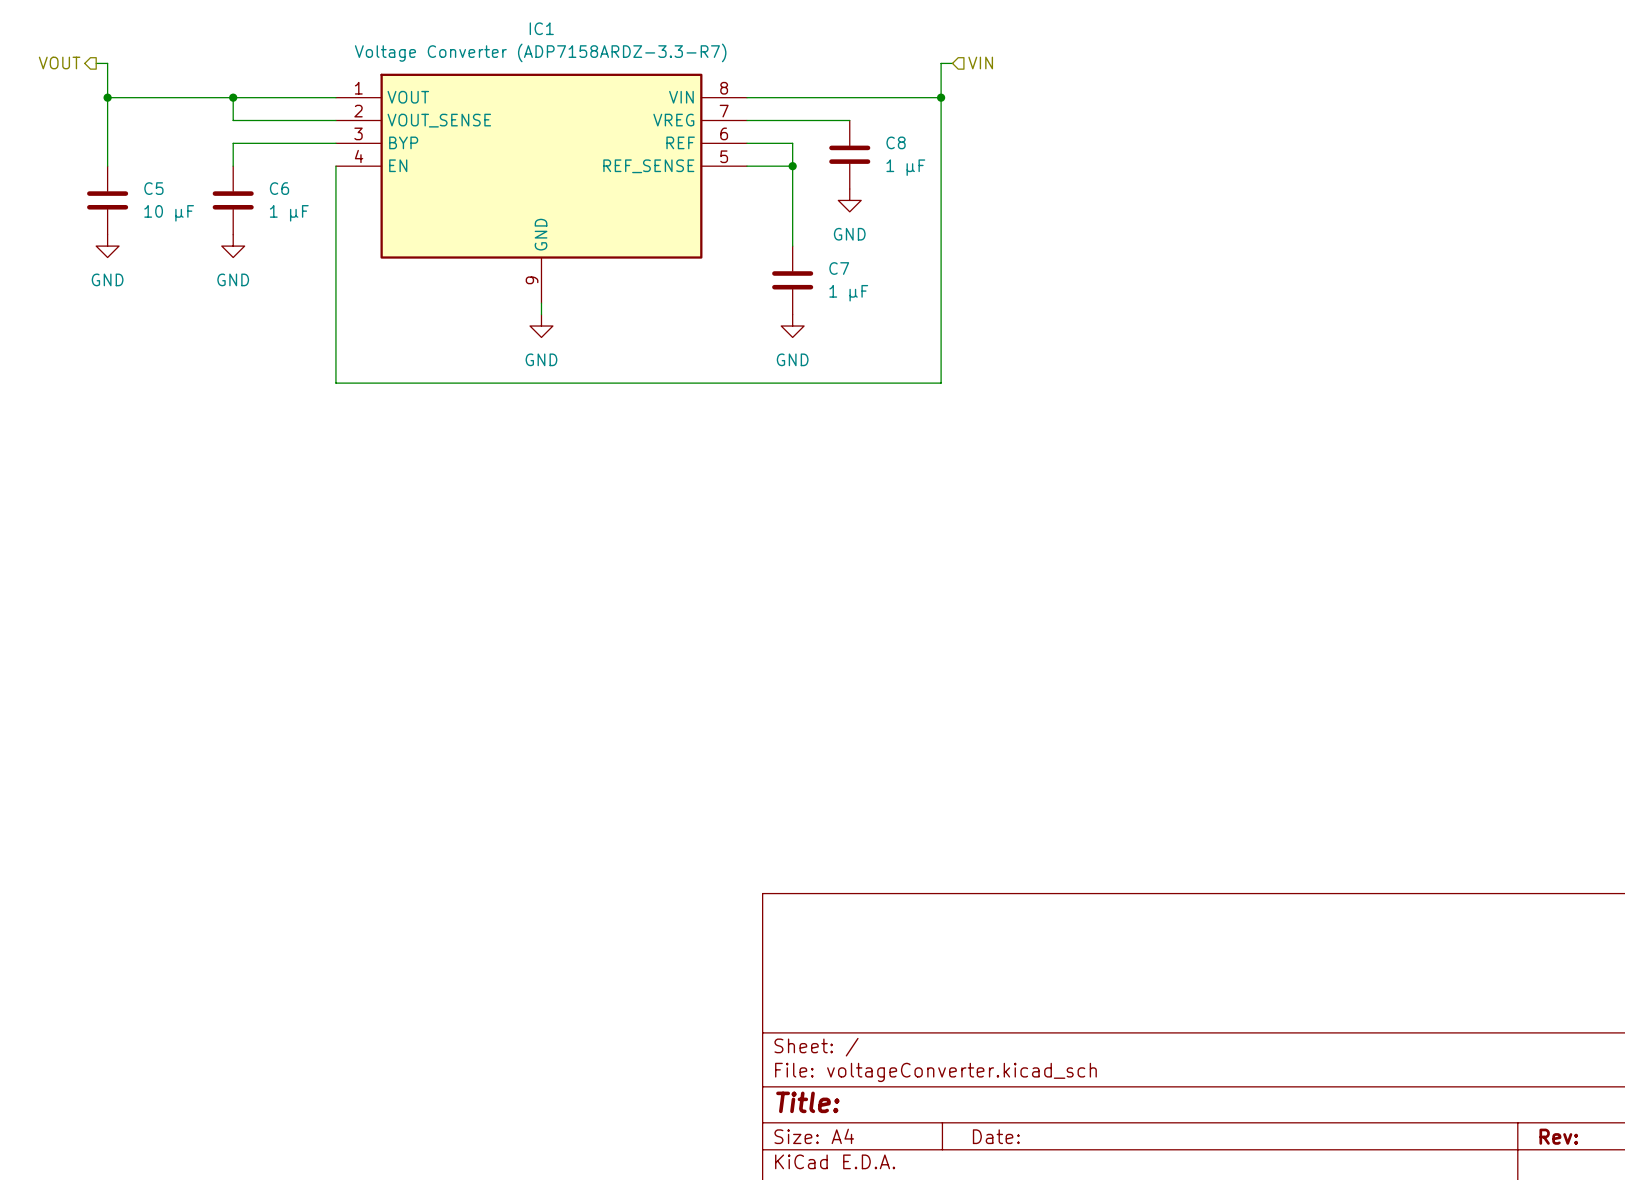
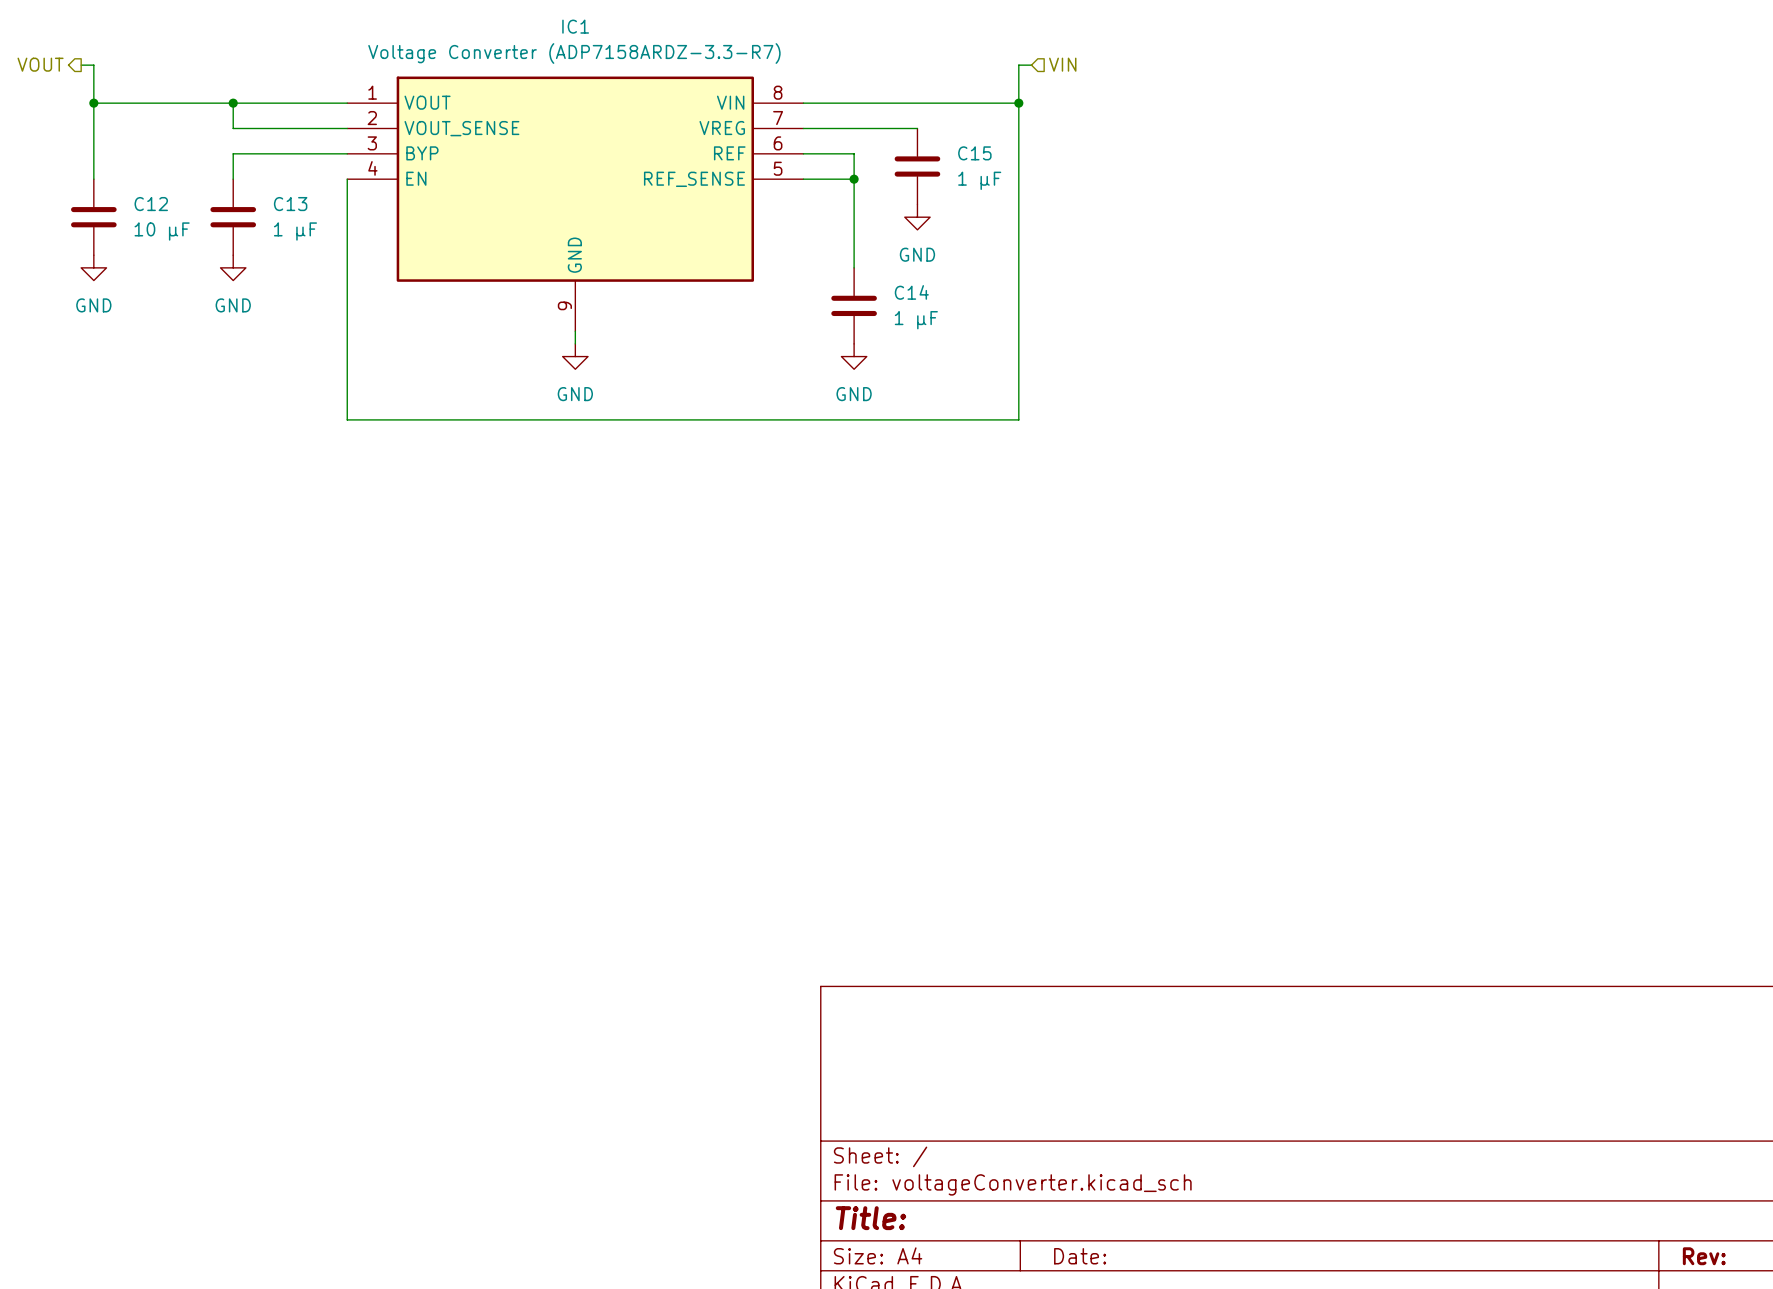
C8 name: C8 (896, 142) -> C15 (974, 153)
C5 name: C5 (153, 188) -> C12 (151, 204)
C6 name: C6 (279, 188) -> C13 (290, 204)
C7 name: C7 (839, 268) -> C14 (911, 292)

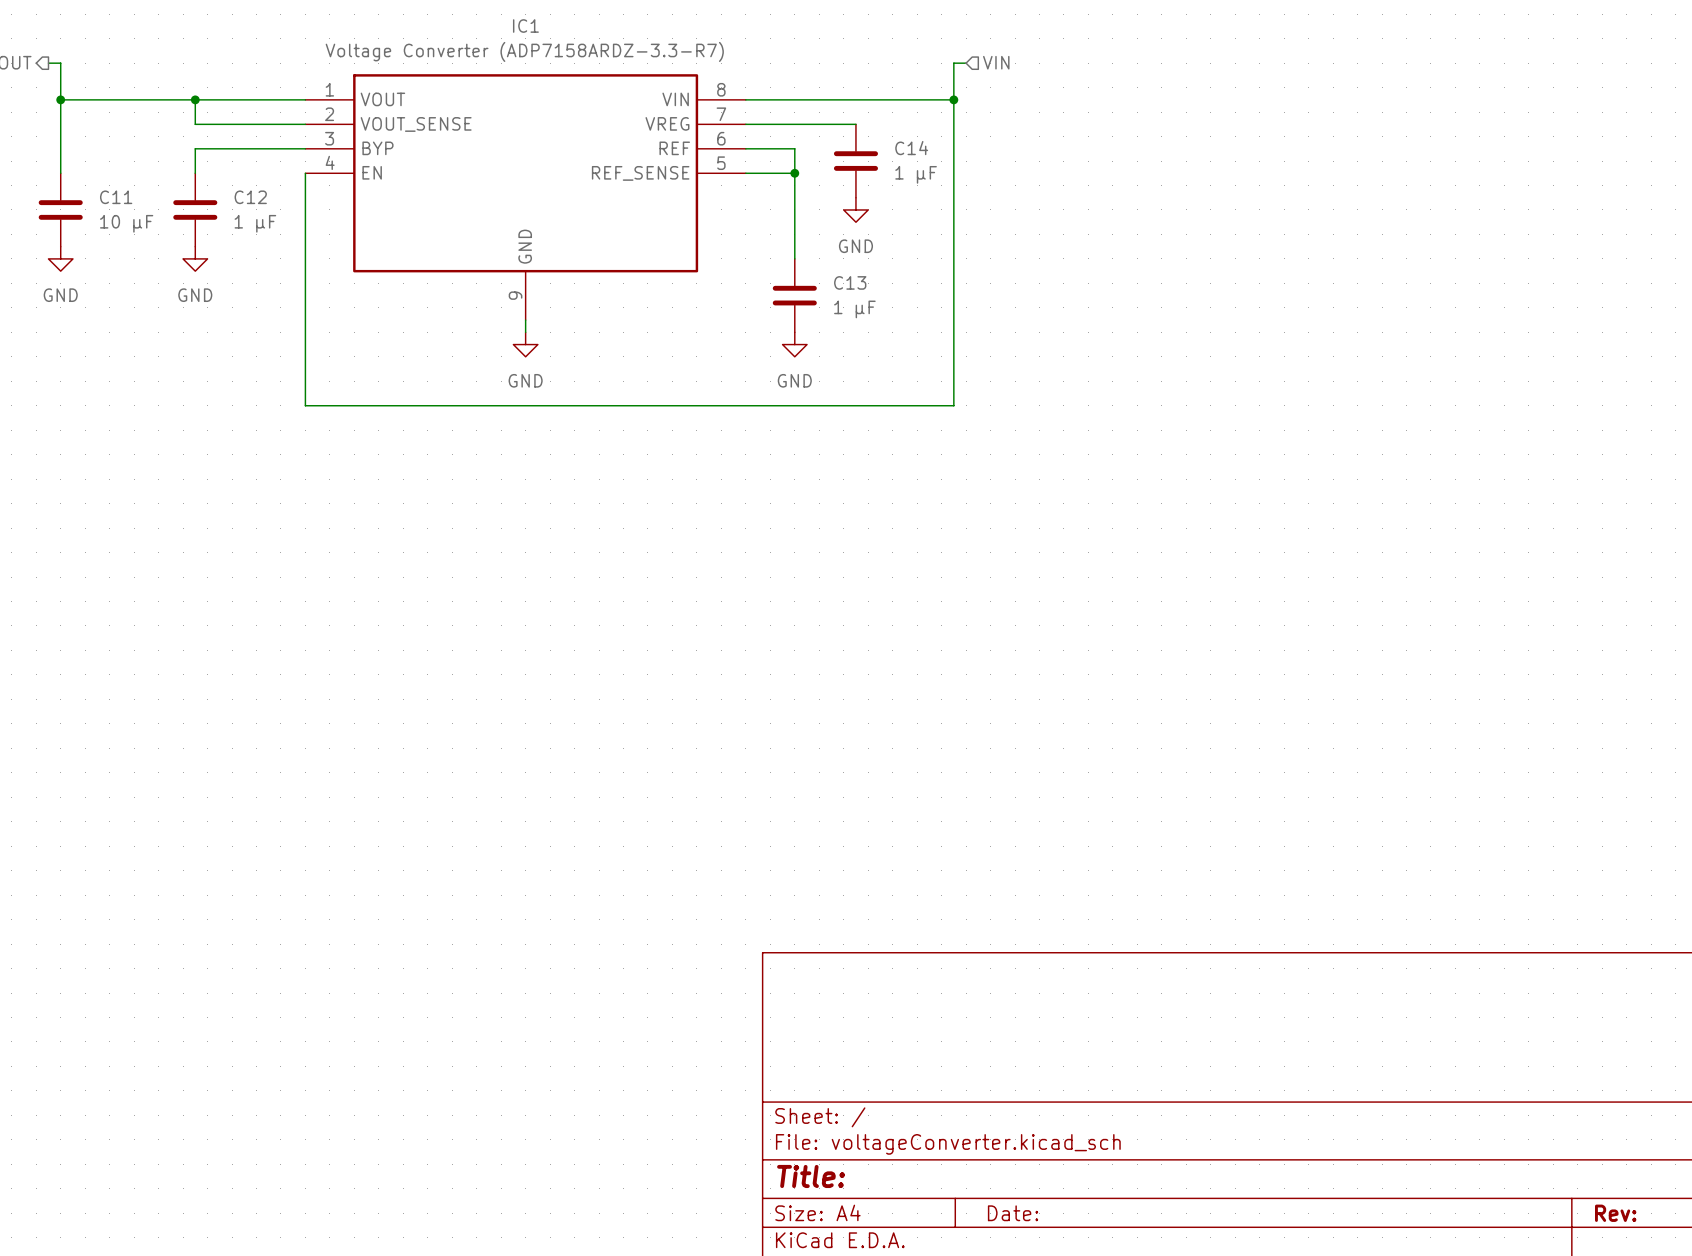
C15 name: C15 (974, 153) -> C14 (911, 148)
C12 name: C12 (151, 204) -> C11 (116, 197)
C13 name: C13 (290, 204) -> C12 (250, 197)
C14 name: C14 (911, 292) -> C13 (850, 282)

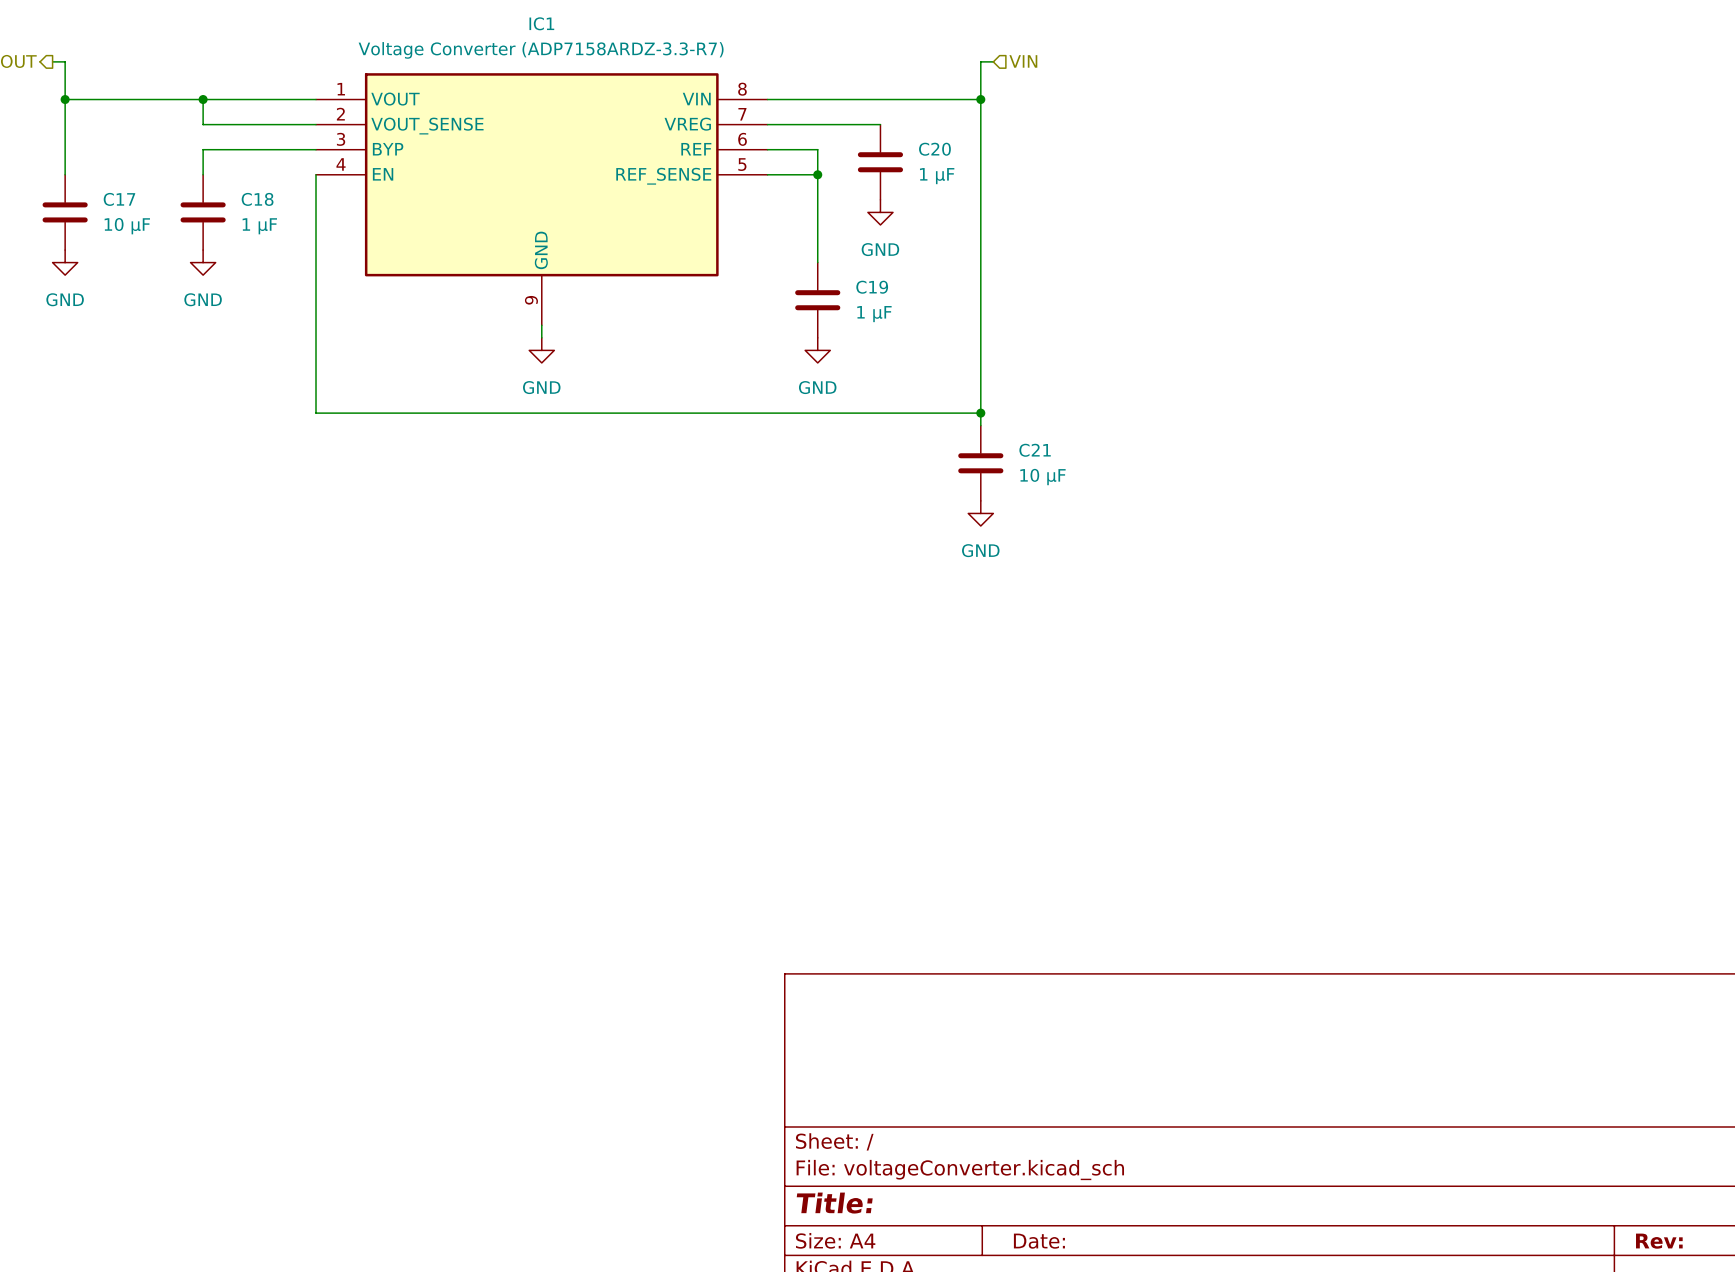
C14 name: C14 (911, 148) -> C20 (934, 149)
C11 name: C11 (116, 197) -> C17 (119, 199)
C12 name: C12 (250, 197) -> C18 (257, 199)
C13 name: C13 (850, 282) -> C19 (872, 287)
wire: none -> (980, 413) (980, 425)
junction: none -> (980, 413)
C21: none -> 10 μF (980, 463)
power symbol: none -> GND (980, 513)

